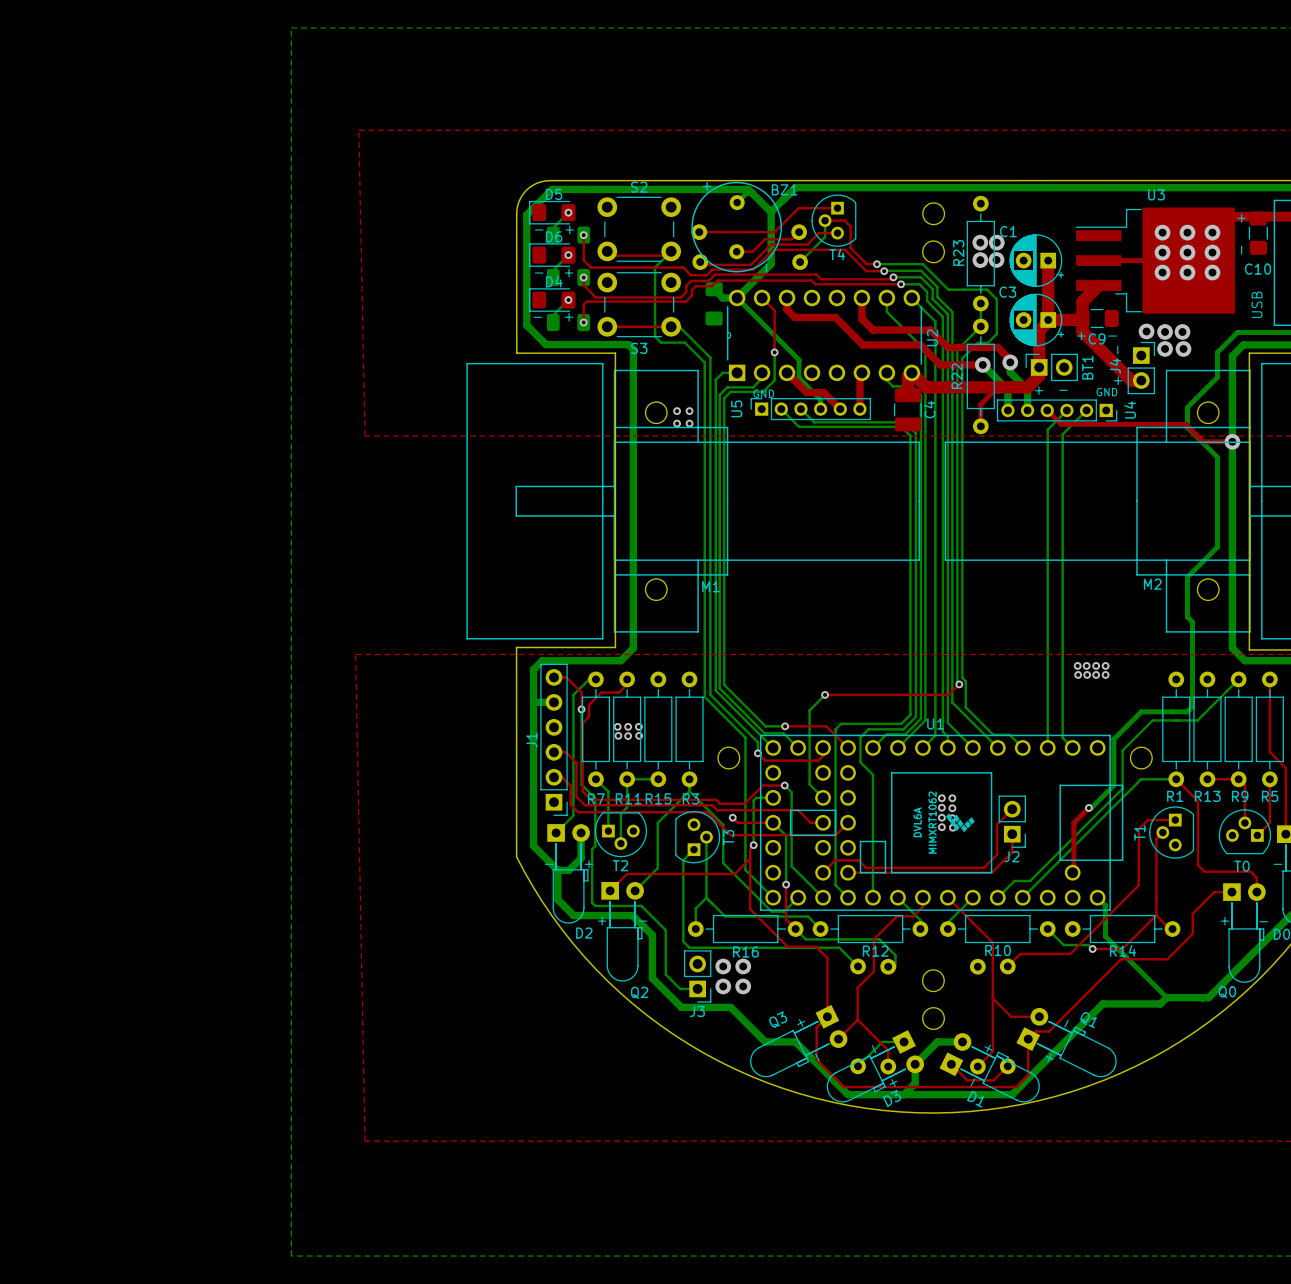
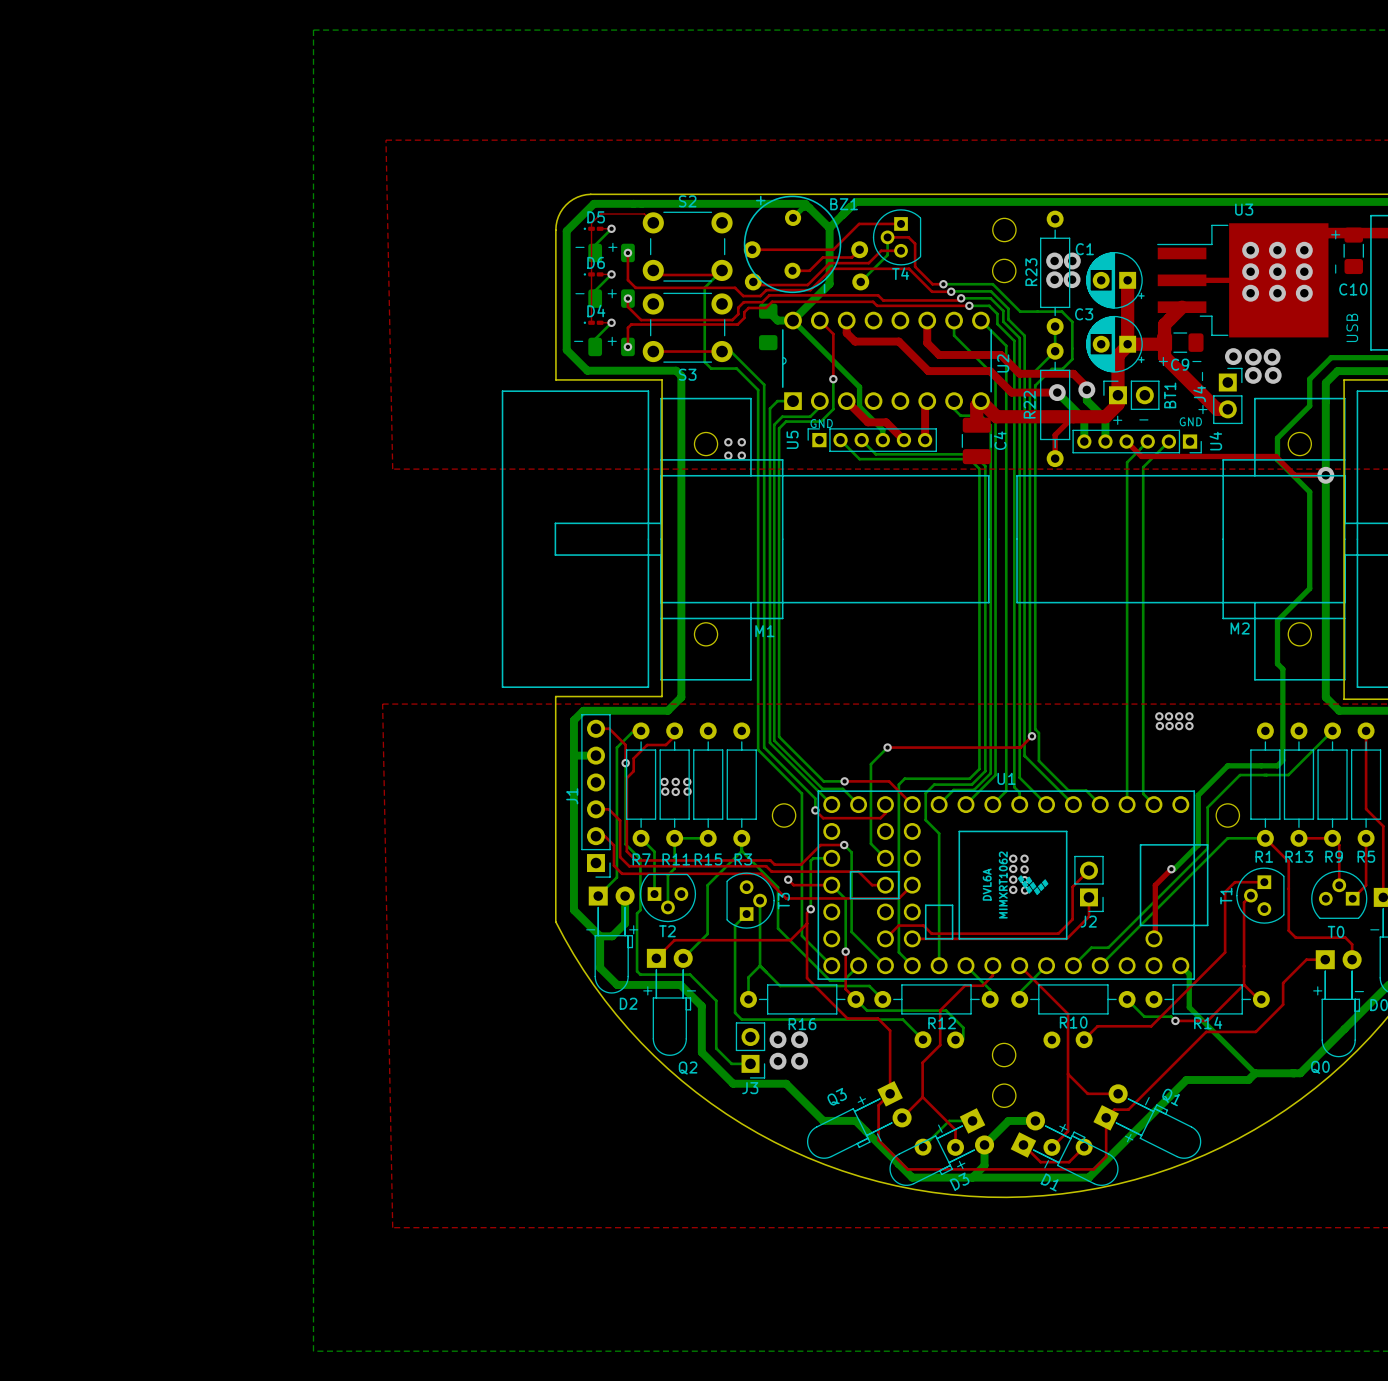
D5 footprint: [529, 200, 576, 225] -> [583, 226, 604, 231]
top track: none -> (653, 222) (644, 214) (600, 214) (591, 223) (591, 322)
top track: none -> (600, 228) (611, 228)
D6 footprint: [529, 243, 576, 267] -> [583, 272, 604, 277]
top track: none -> (600, 274) (611, 274)
D4 footprint: [529, 288, 576, 312] -> [583, 320, 604, 325]
top track: none -> (600, 322) (611, 322)

